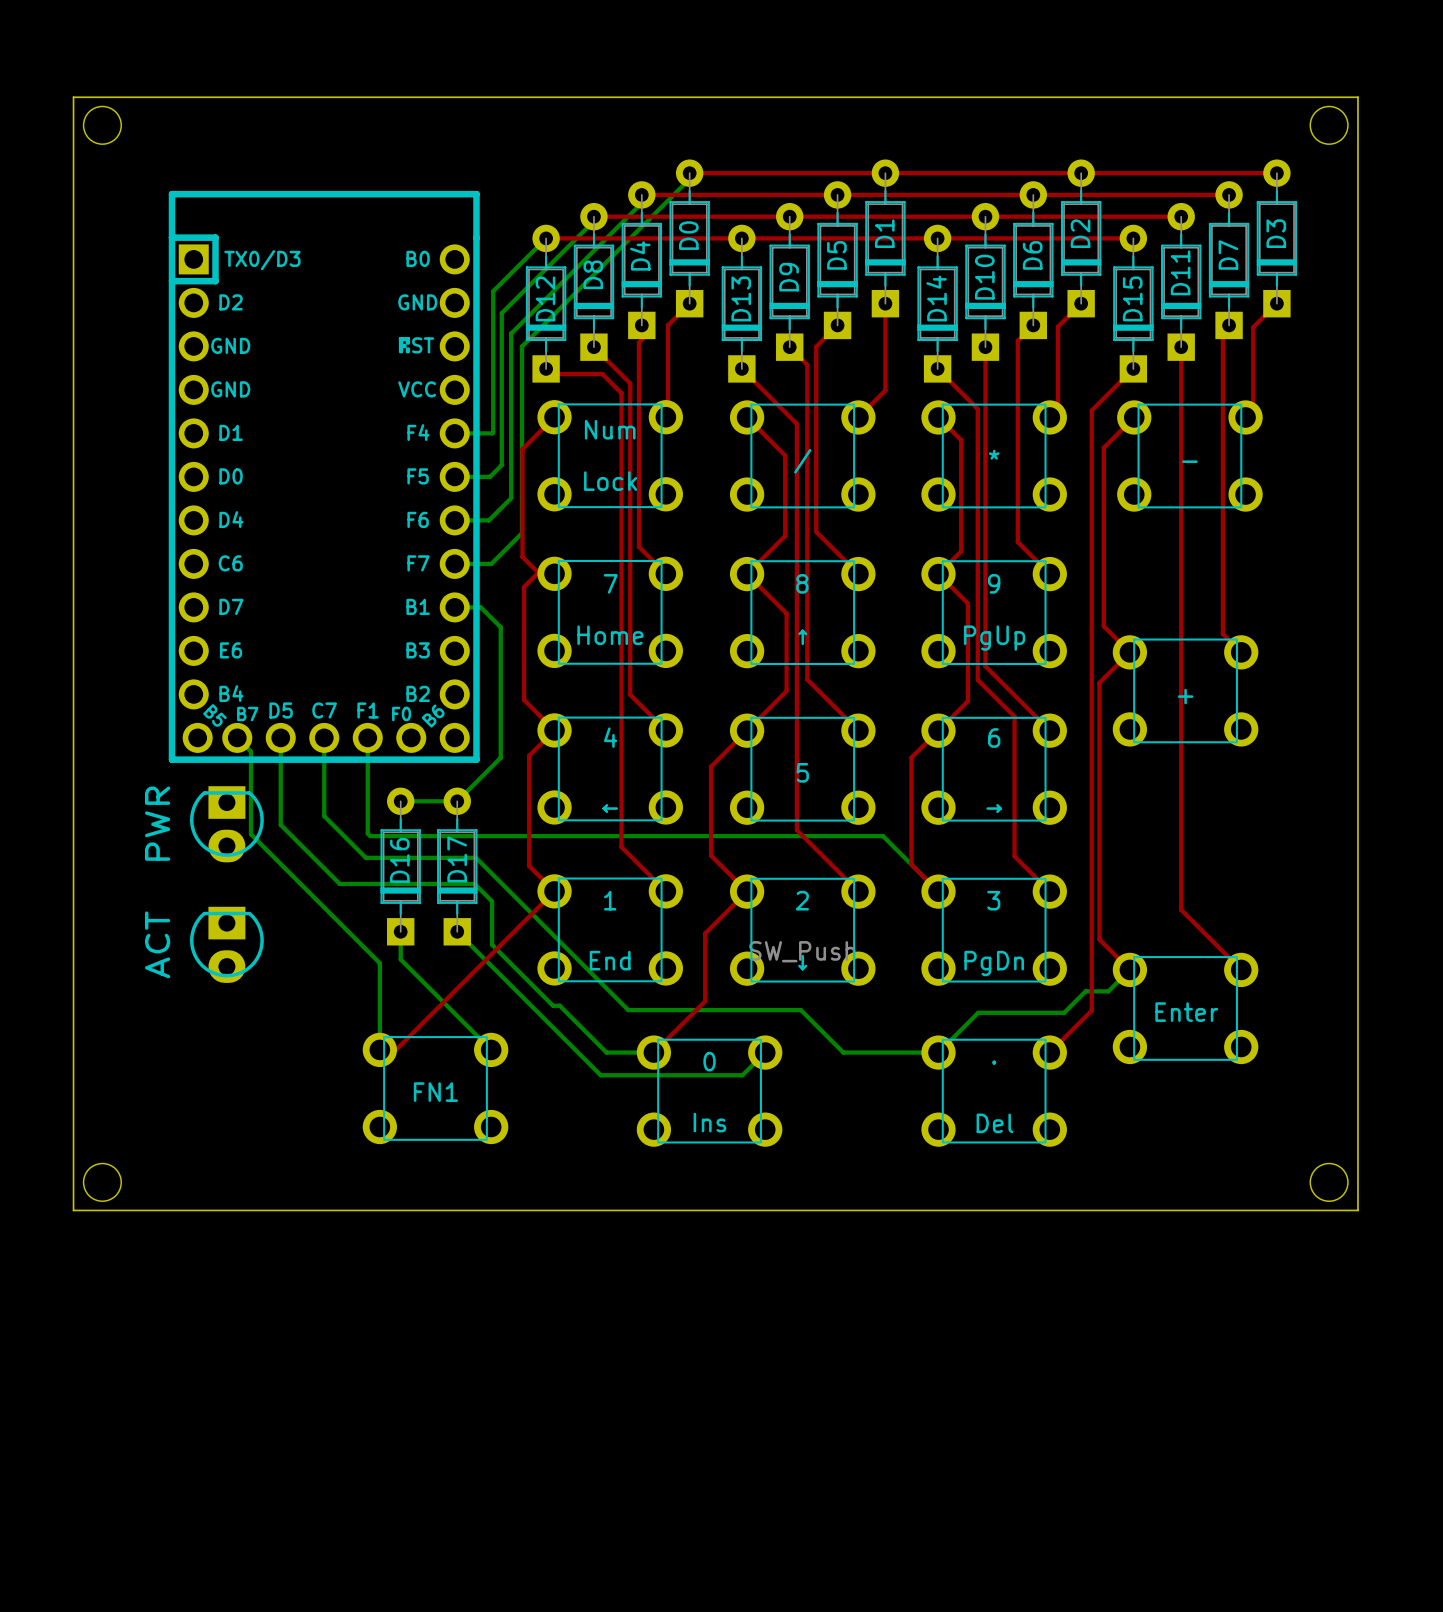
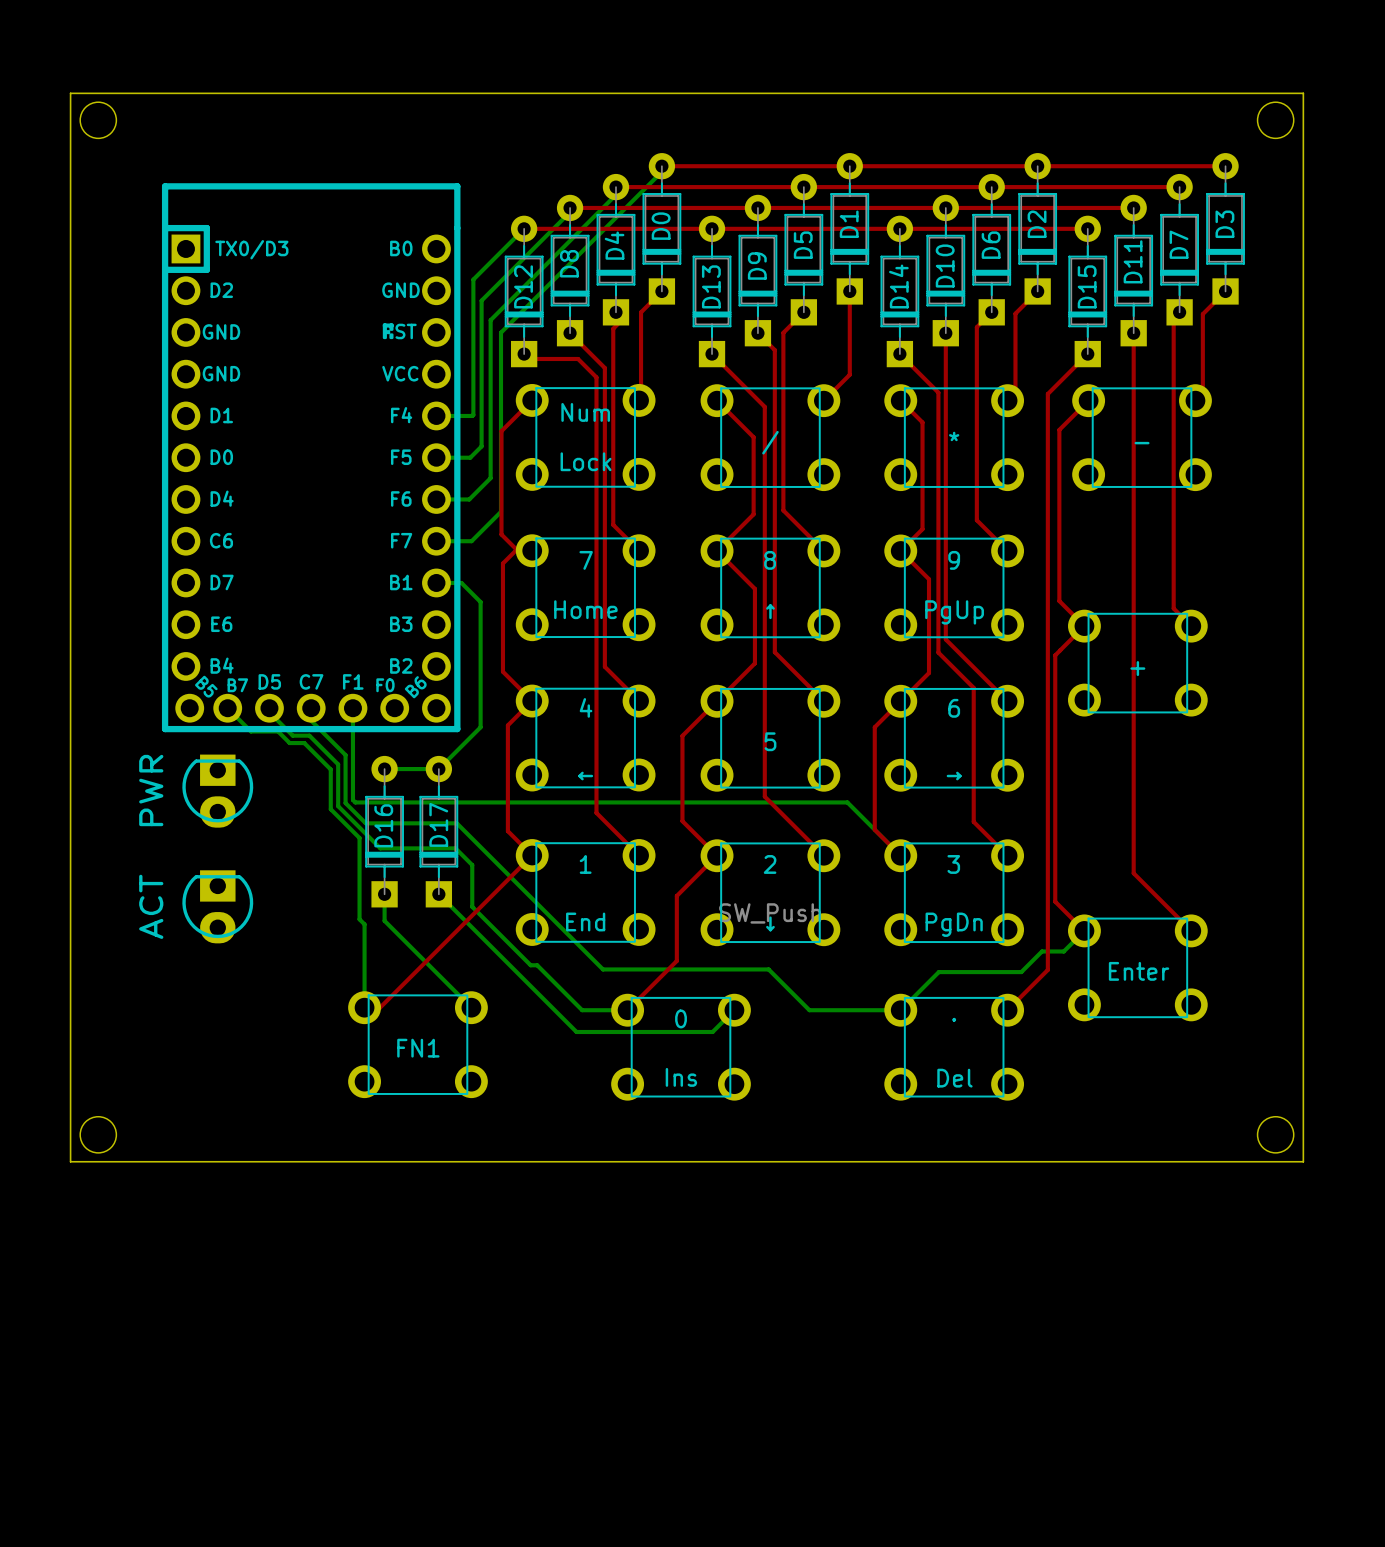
bottom track: (280, 742) (280, 824) (339, 883) (396, 883) -> (269, 712) (292, 735) (309, 735) (338, 764) (338, 806) (380, 848)
bottom track: (324, 750) (324, 816) (365, 857) (381, 857) -> (311, 720) (345, 755) (345, 803) (365, 823)
bottom track: (250, 751) (250, 834) (374, 957) -> (240, 721) (250, 731) (278, 731) (289, 743) (304, 743) (330, 769) (330, 809) (359, 838) (359, 919)

